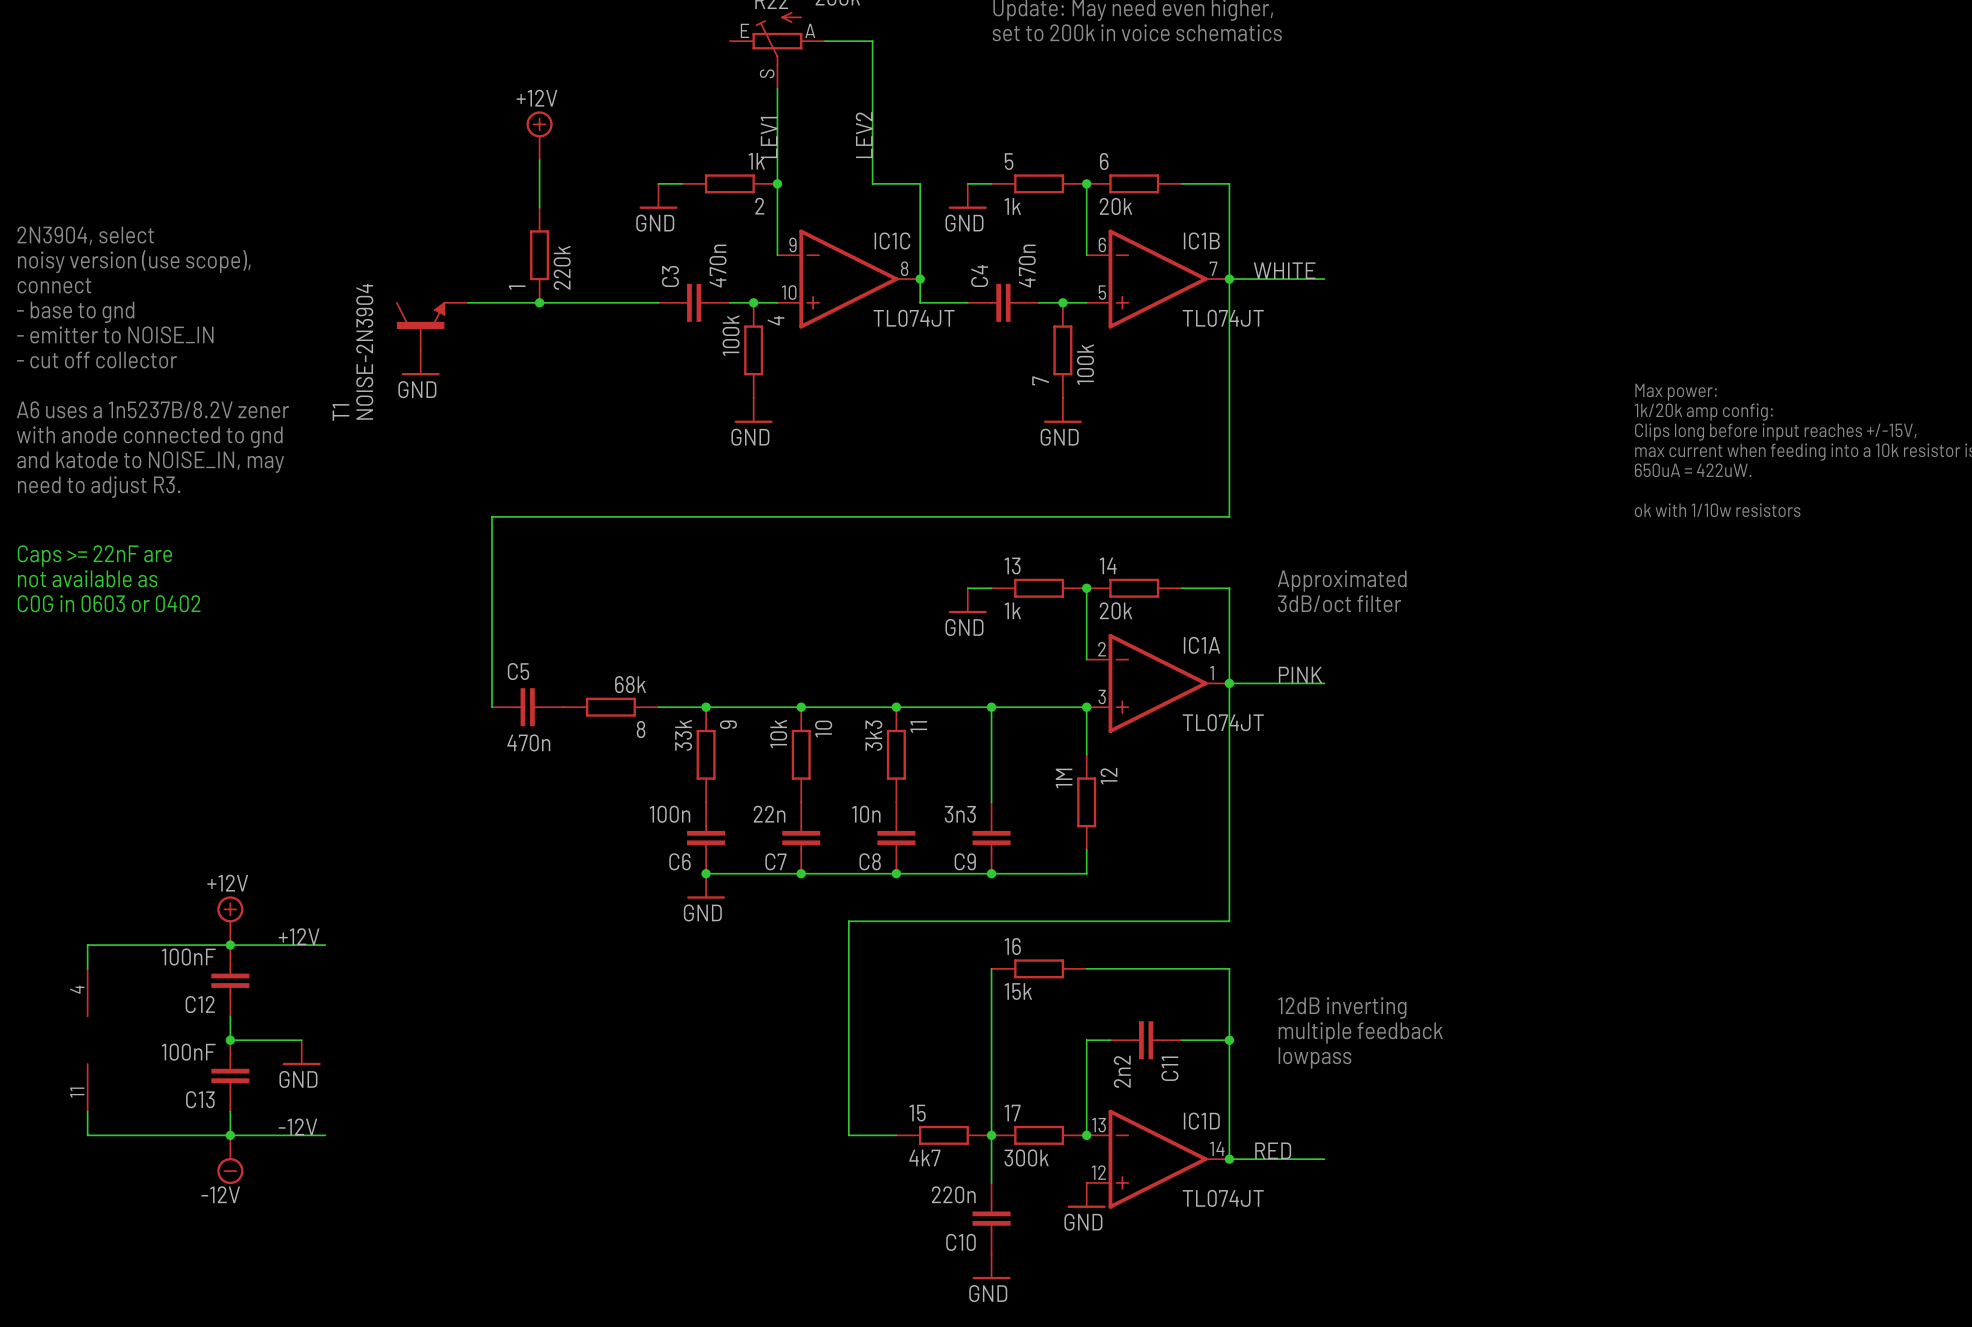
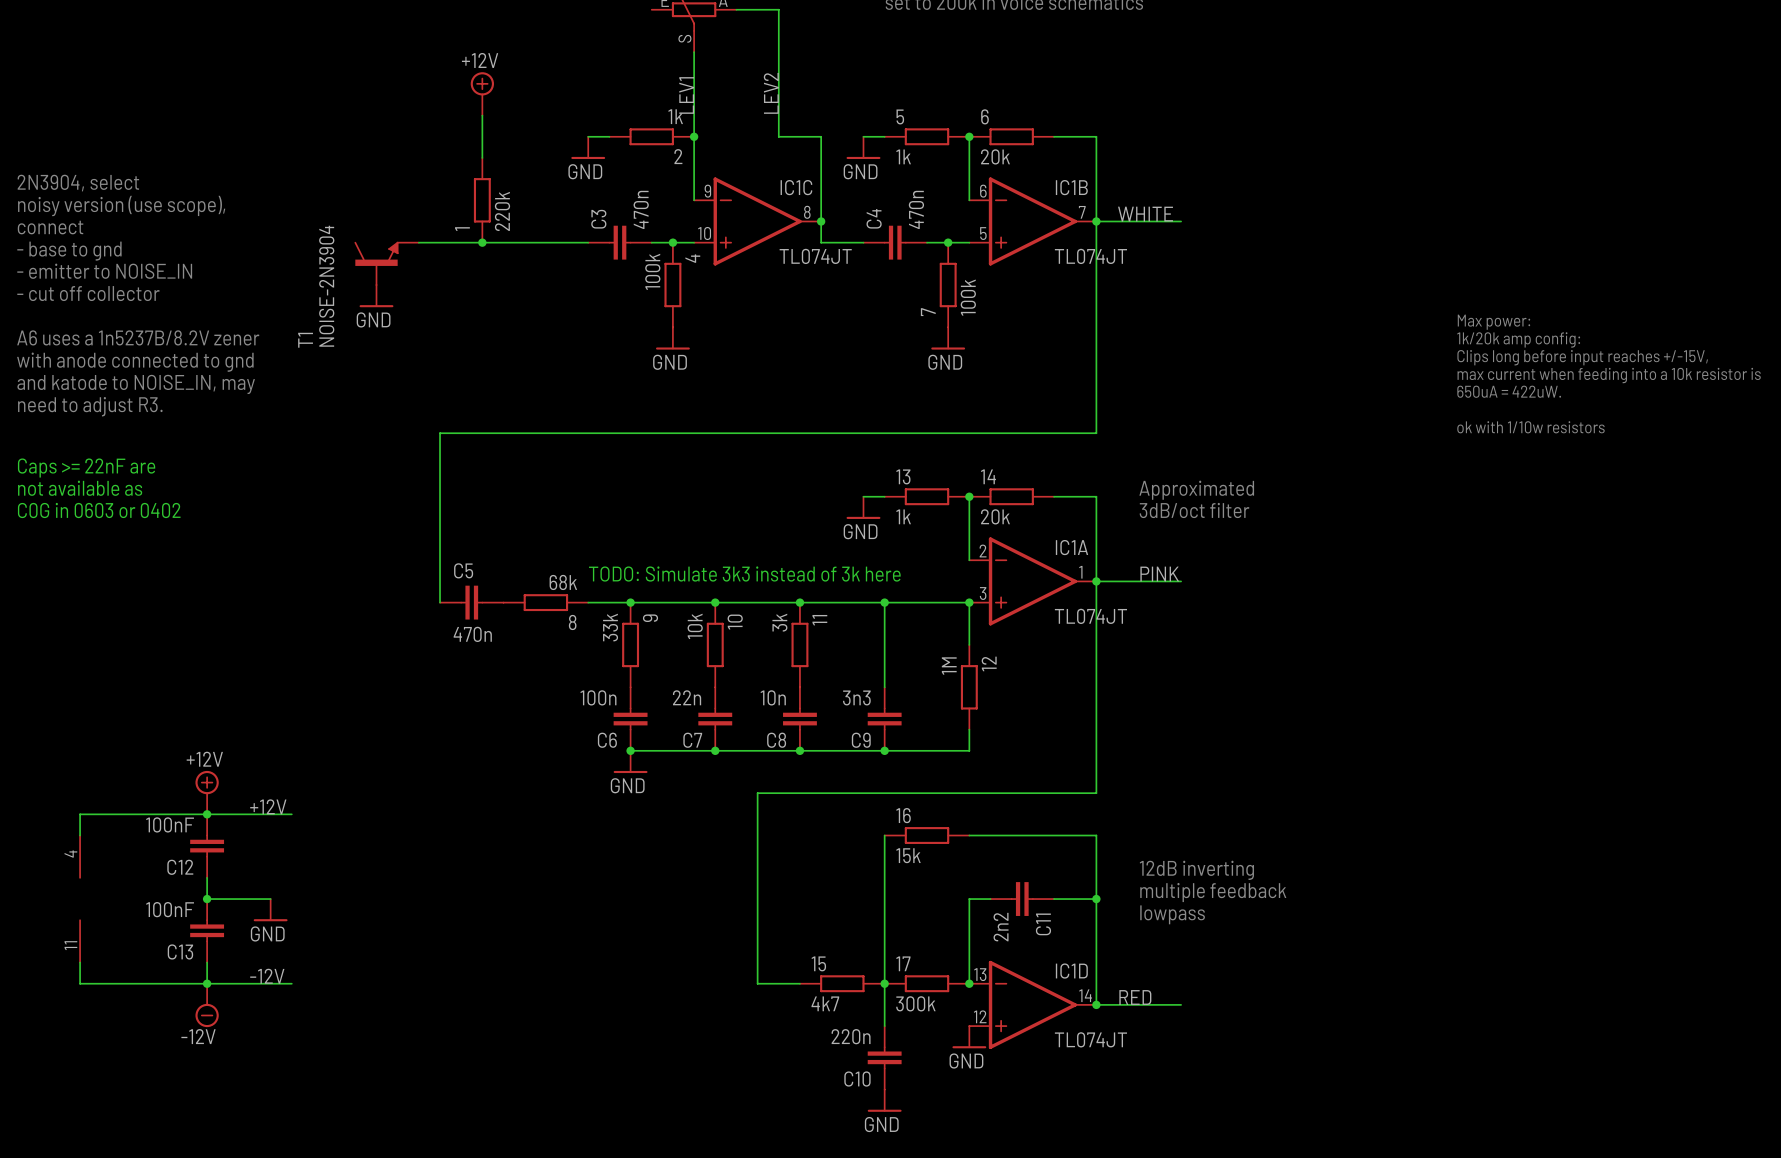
text: none -> TODO: Simulate 3k3 instead of 3k here (744, 574)
11 value: 3k3 (873, 735) -> 3k (779, 622)

